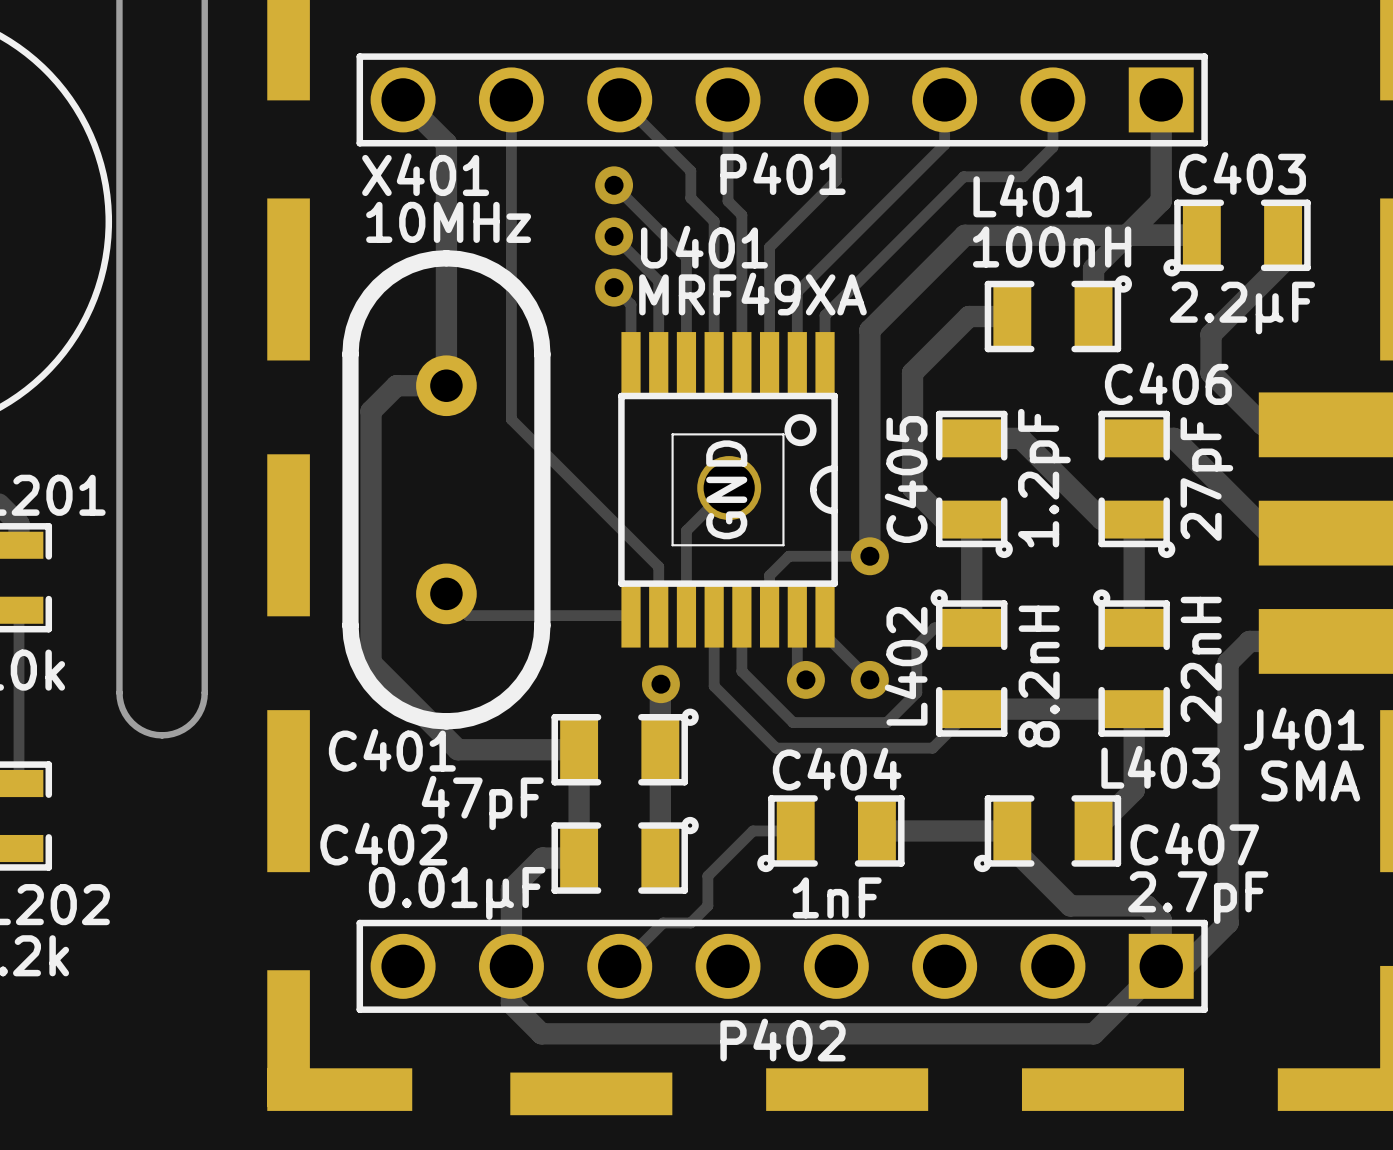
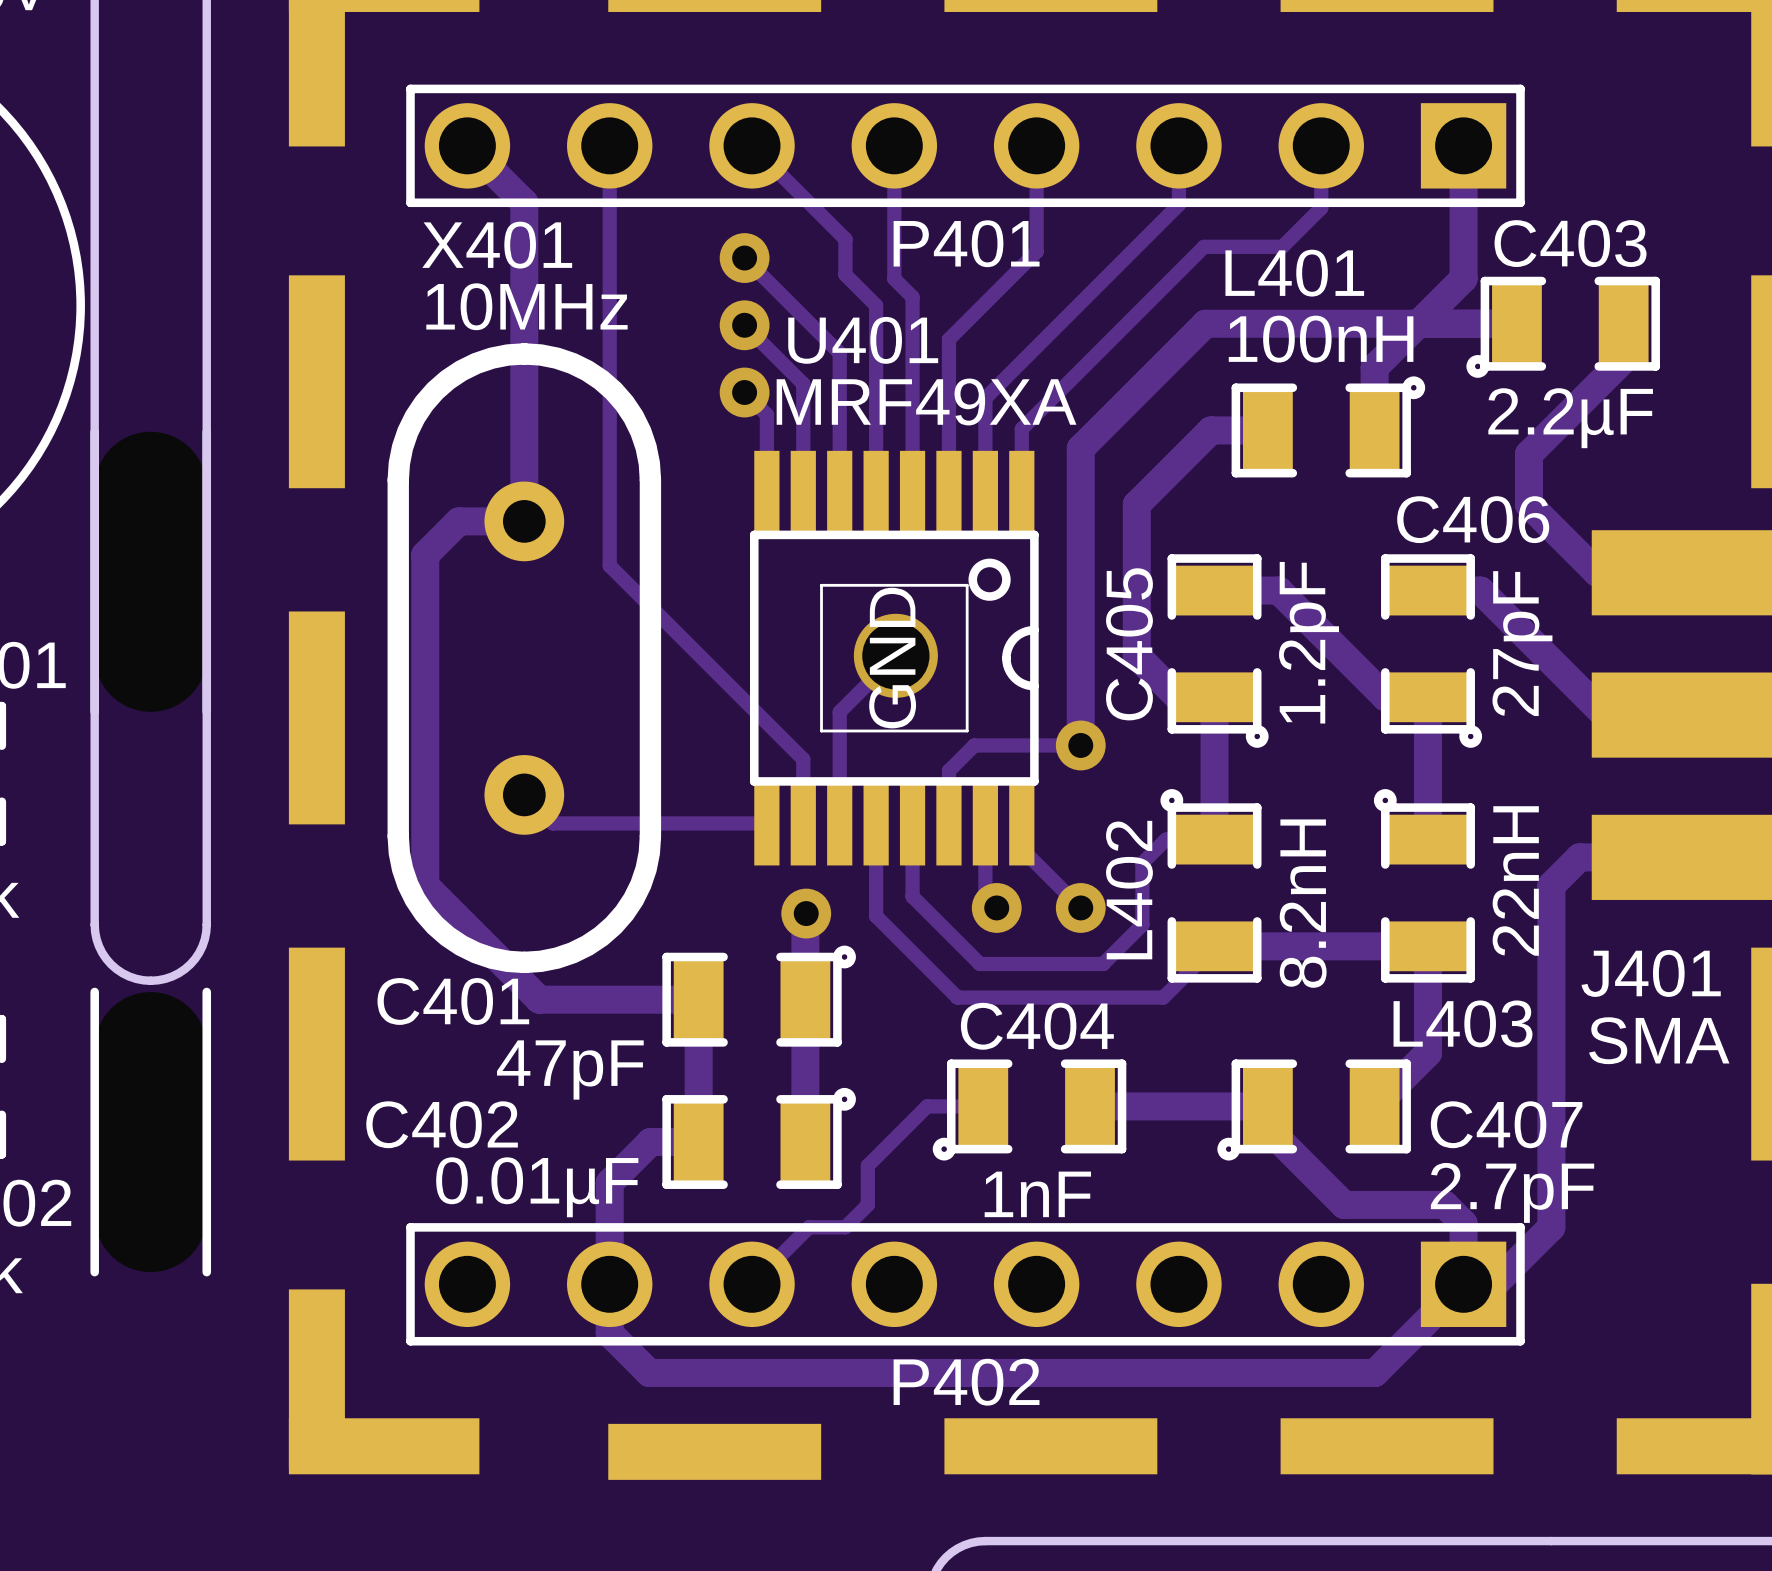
part: none -> (150, 571)
part: none -> (150, 1132)

